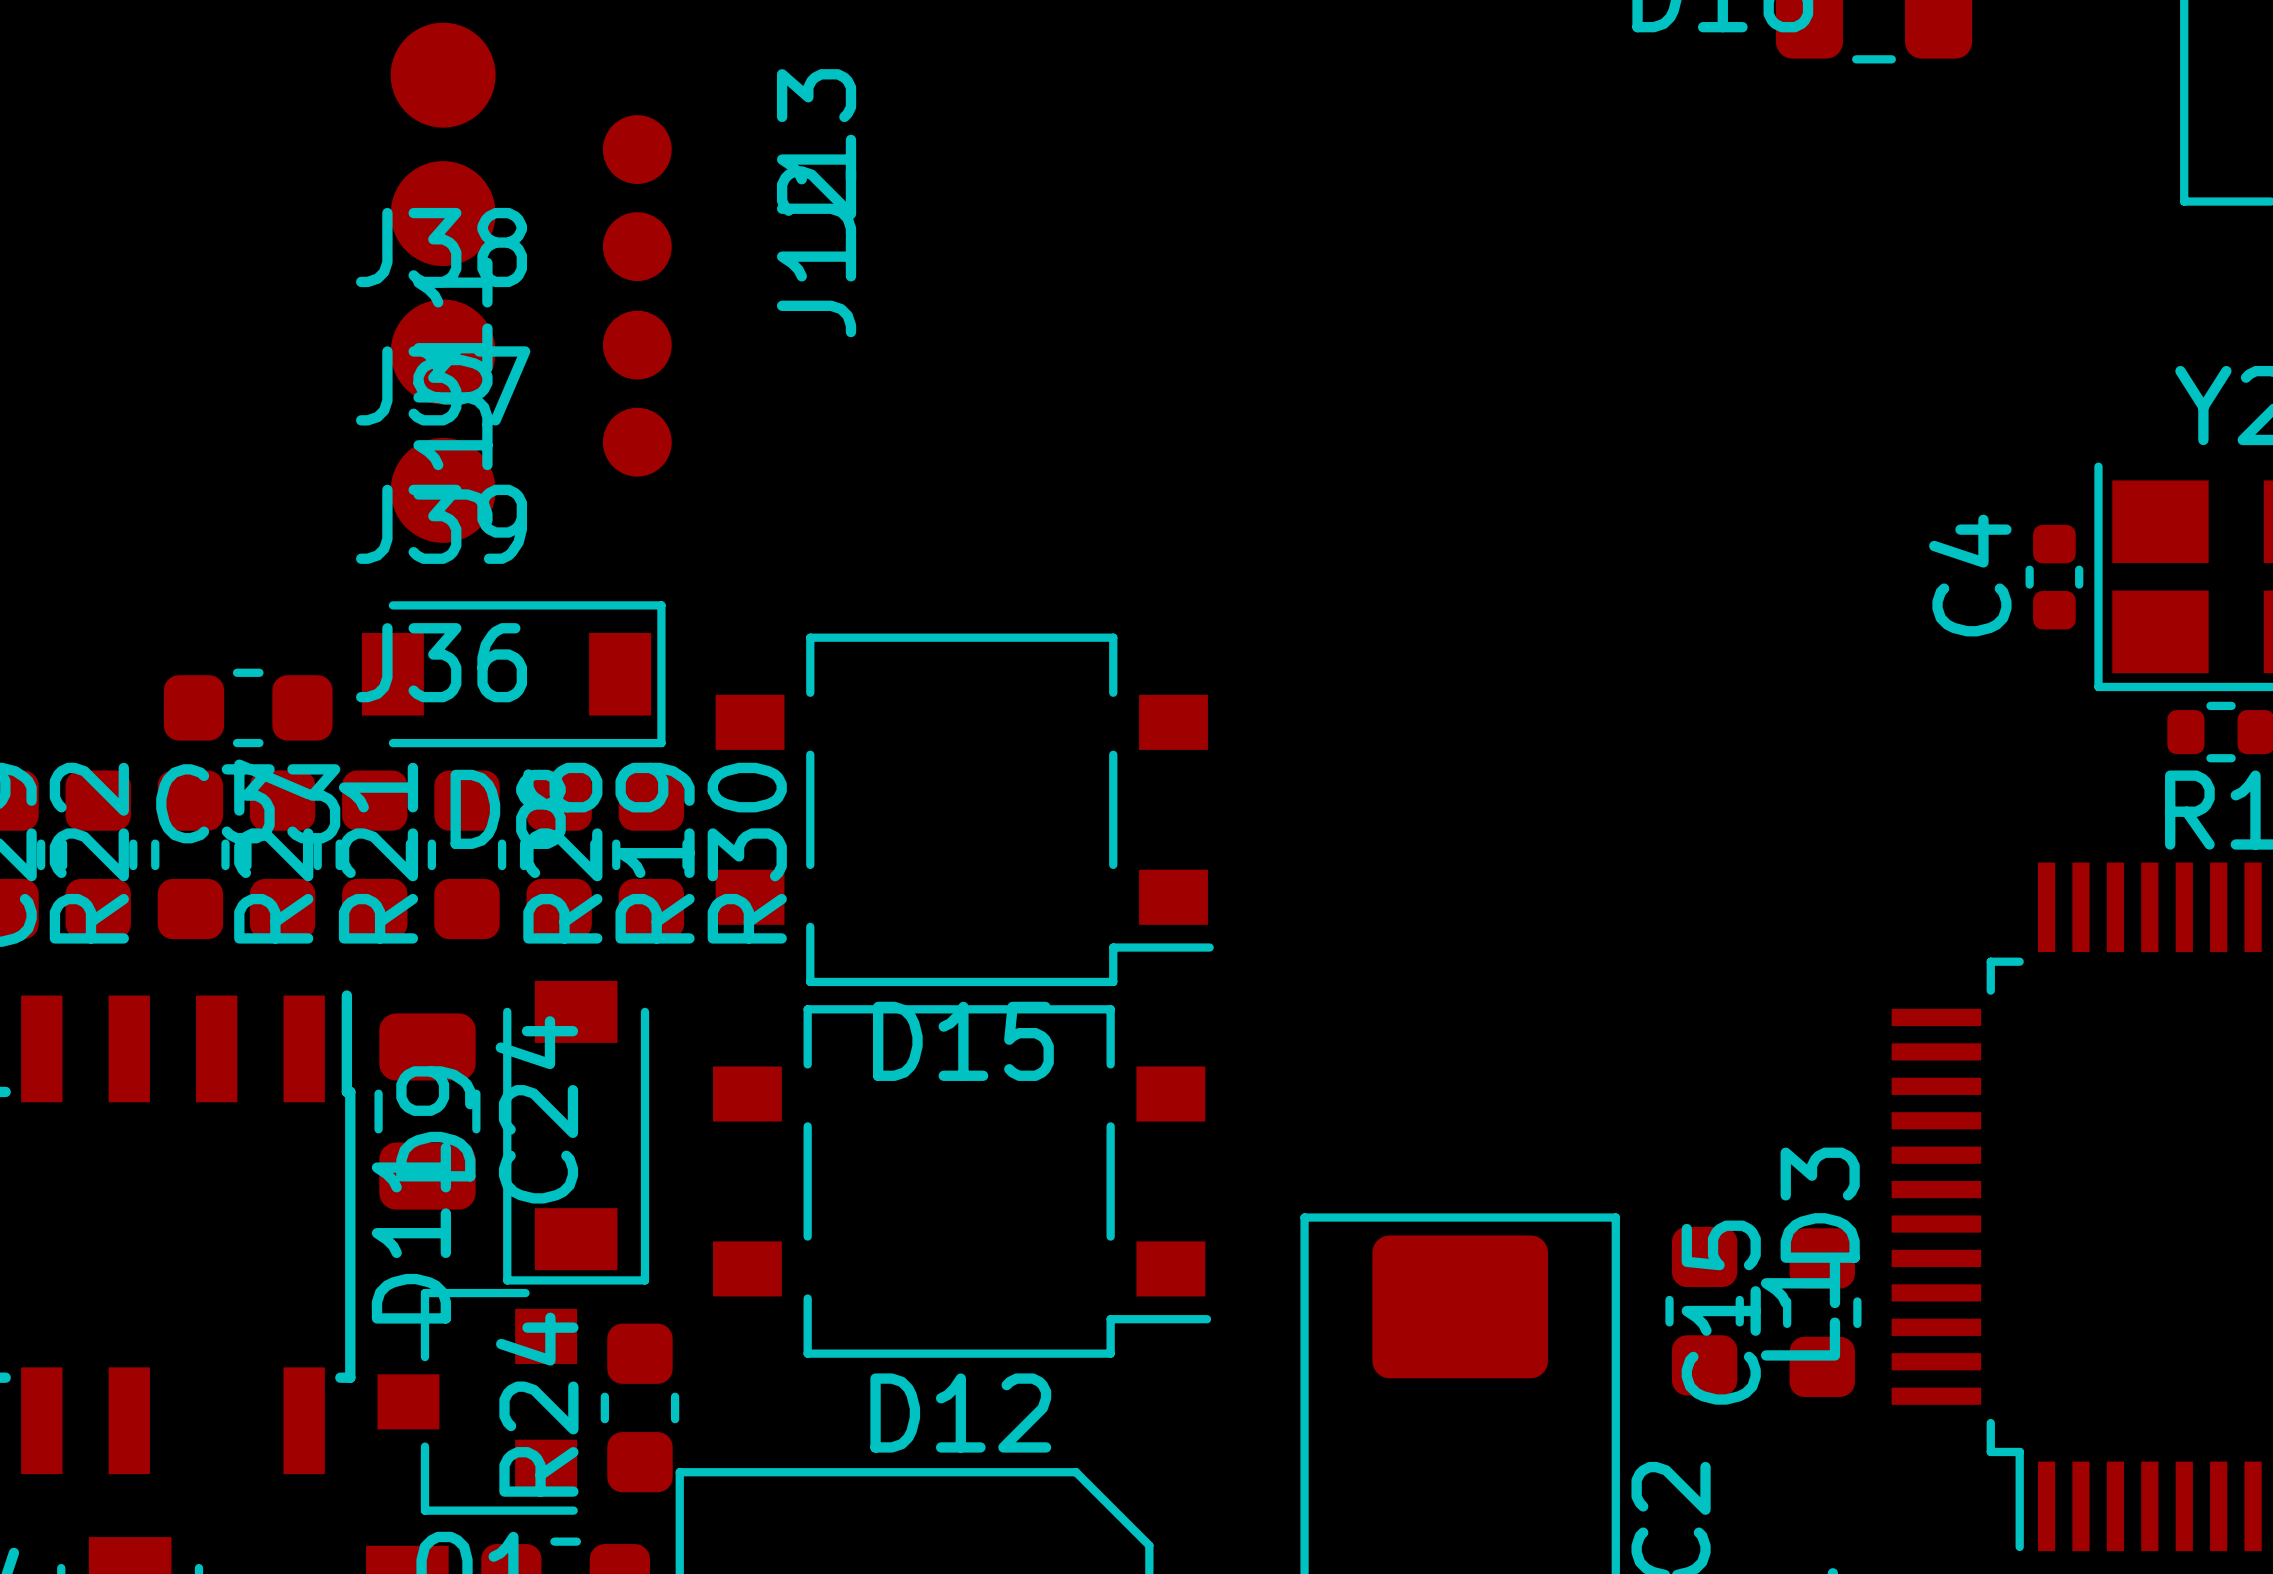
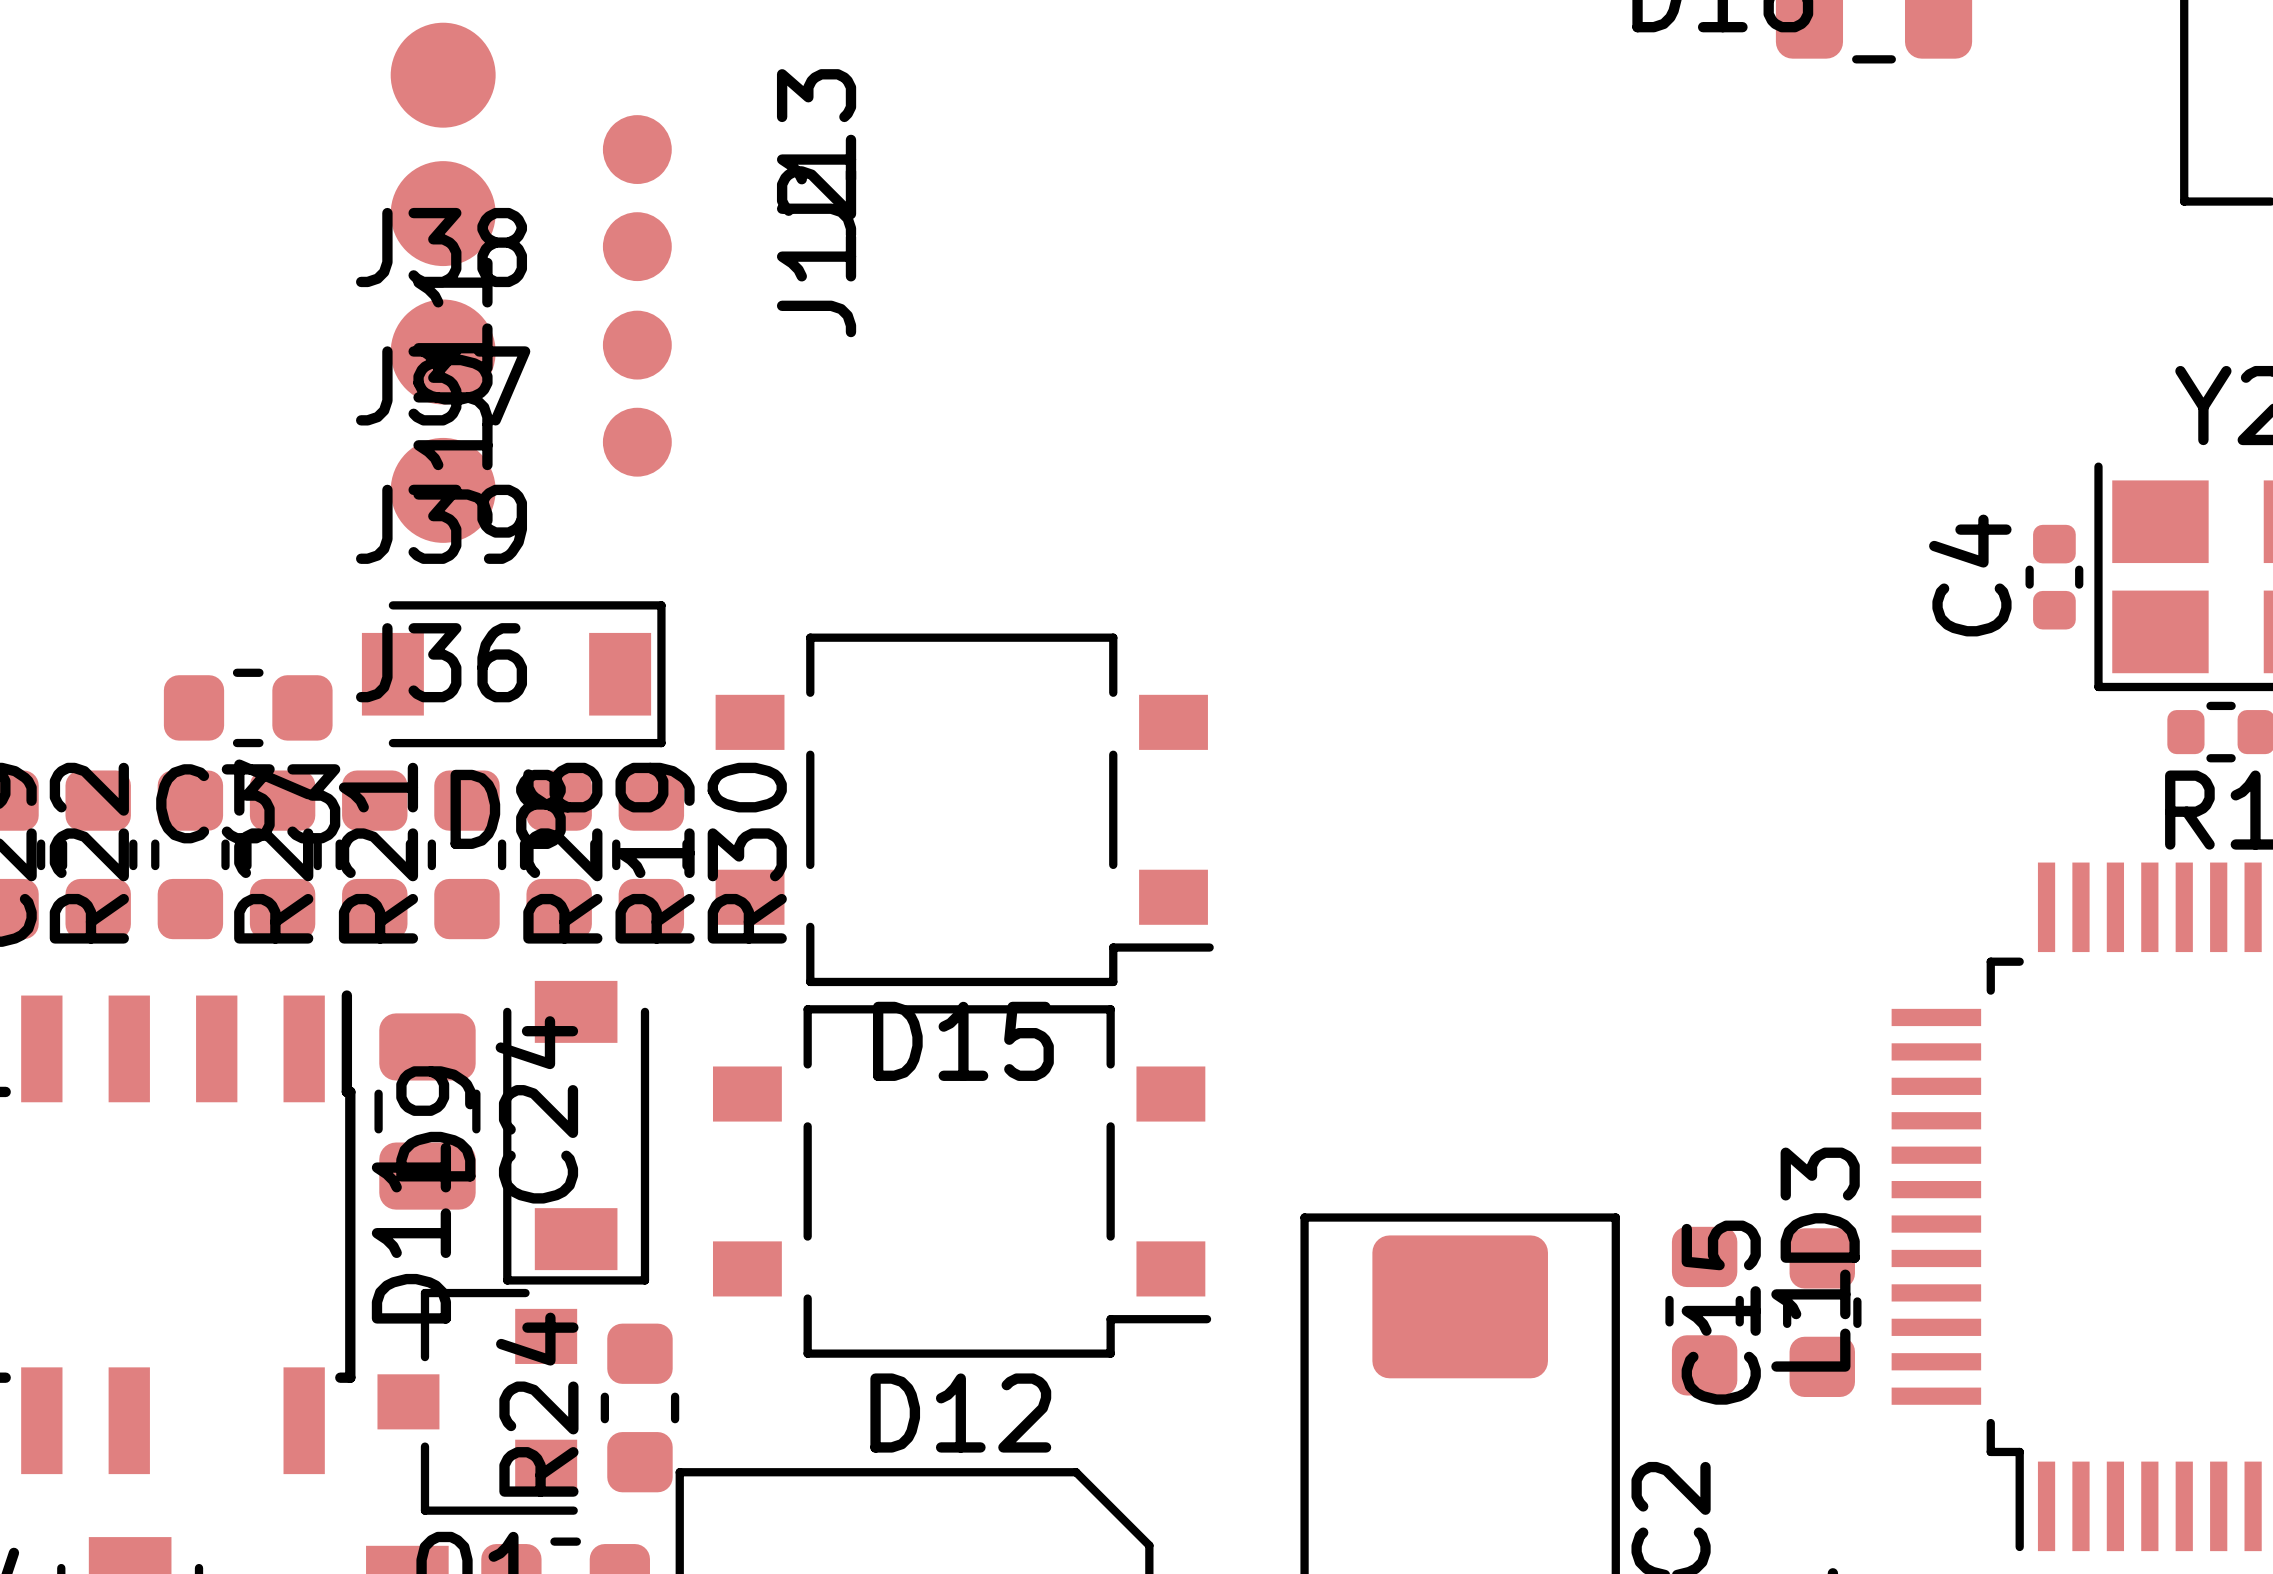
L1 name position: L1 (1800, 1309) -> L1 (1810, 1320)

